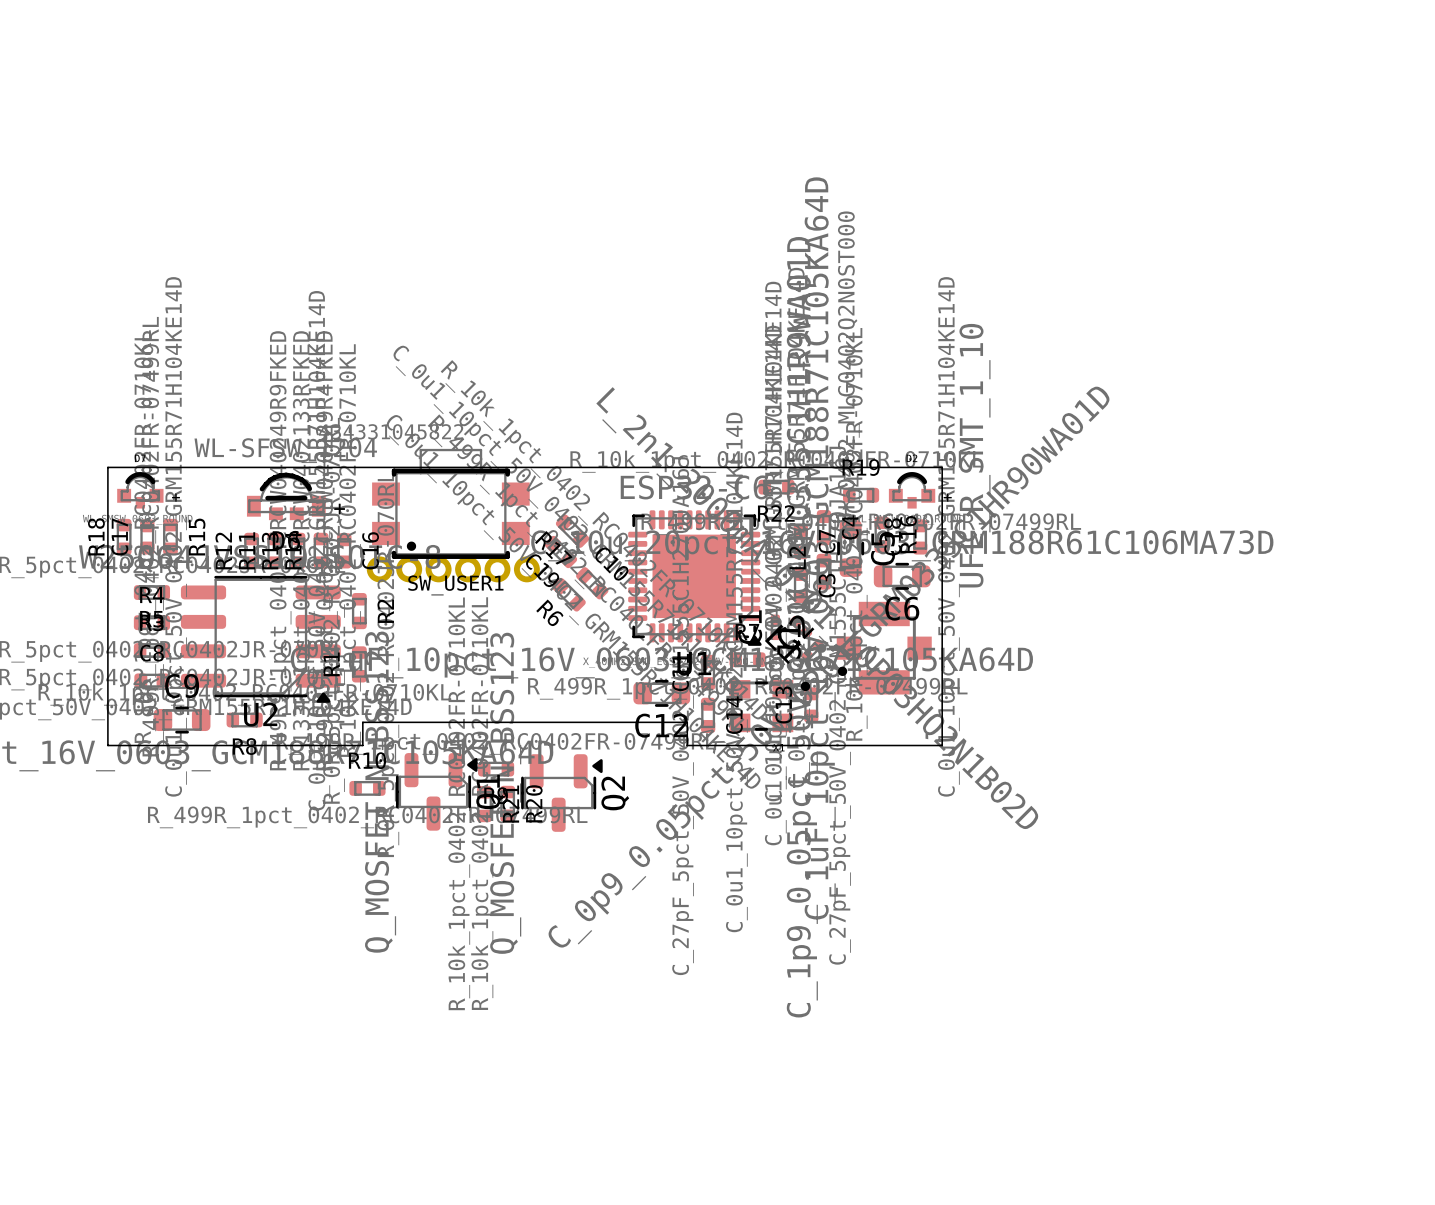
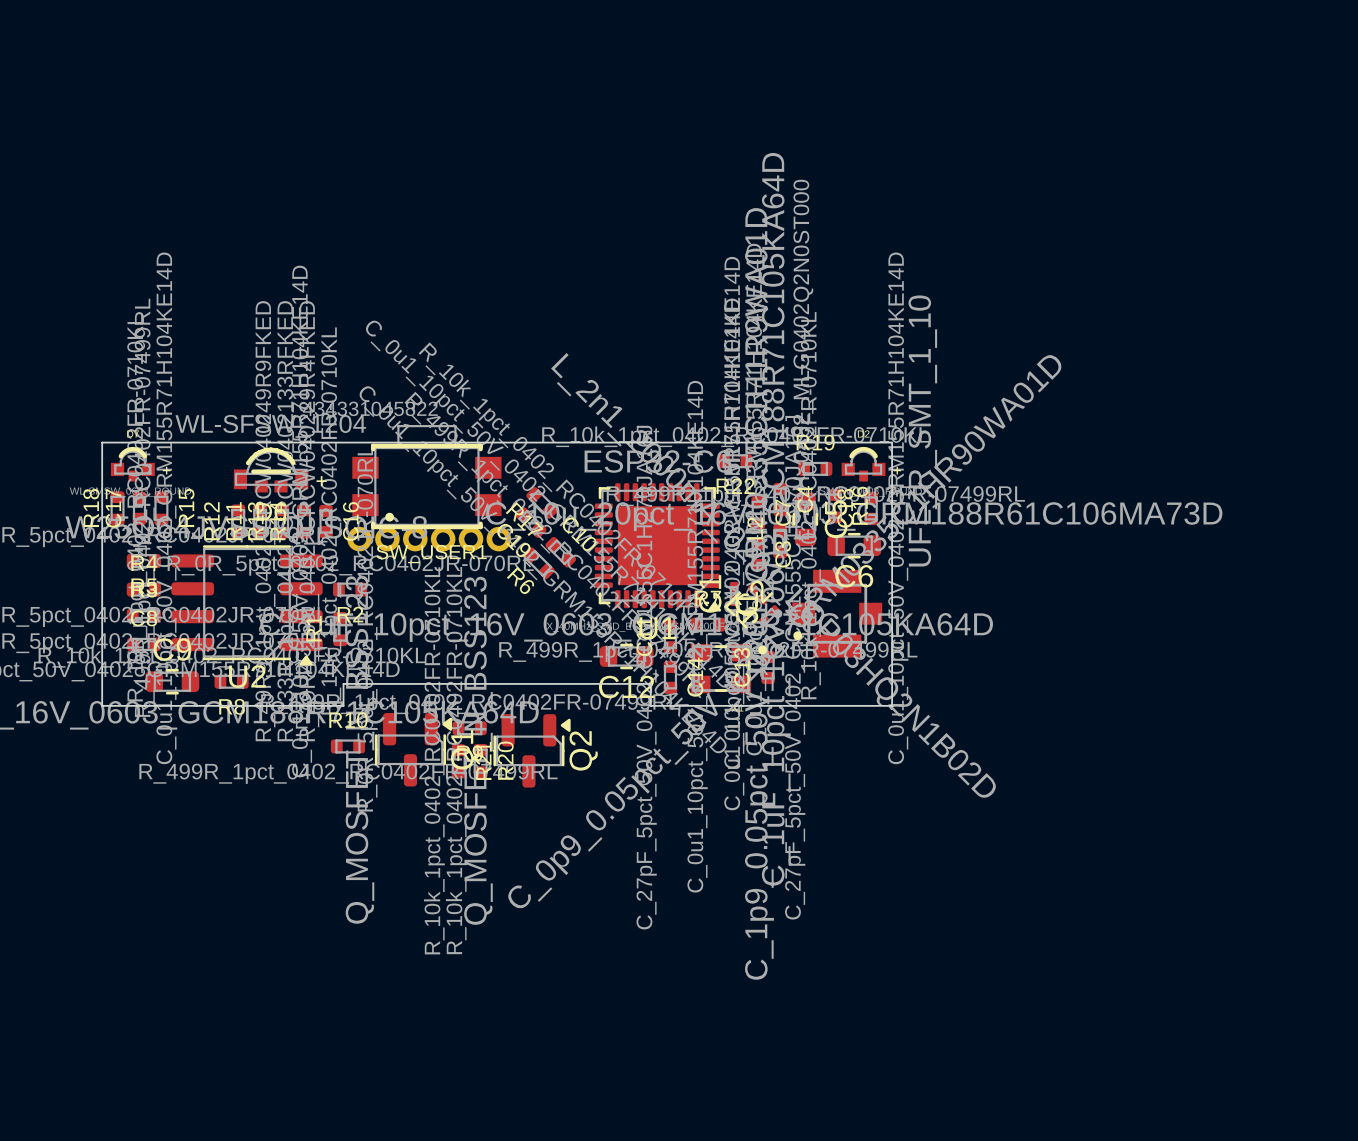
R2 rotation: 0° (359, 611) -> 90° clockwise (350, 589)

